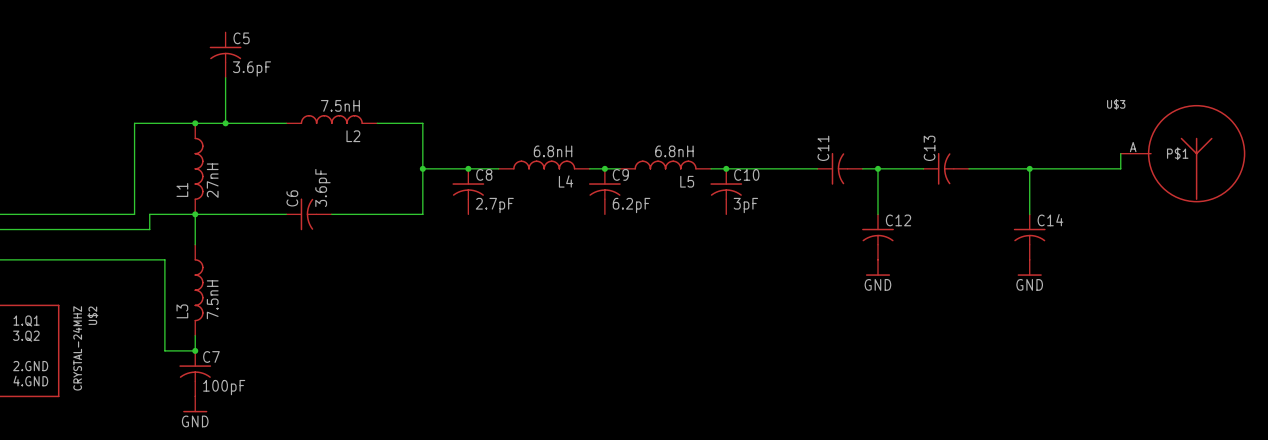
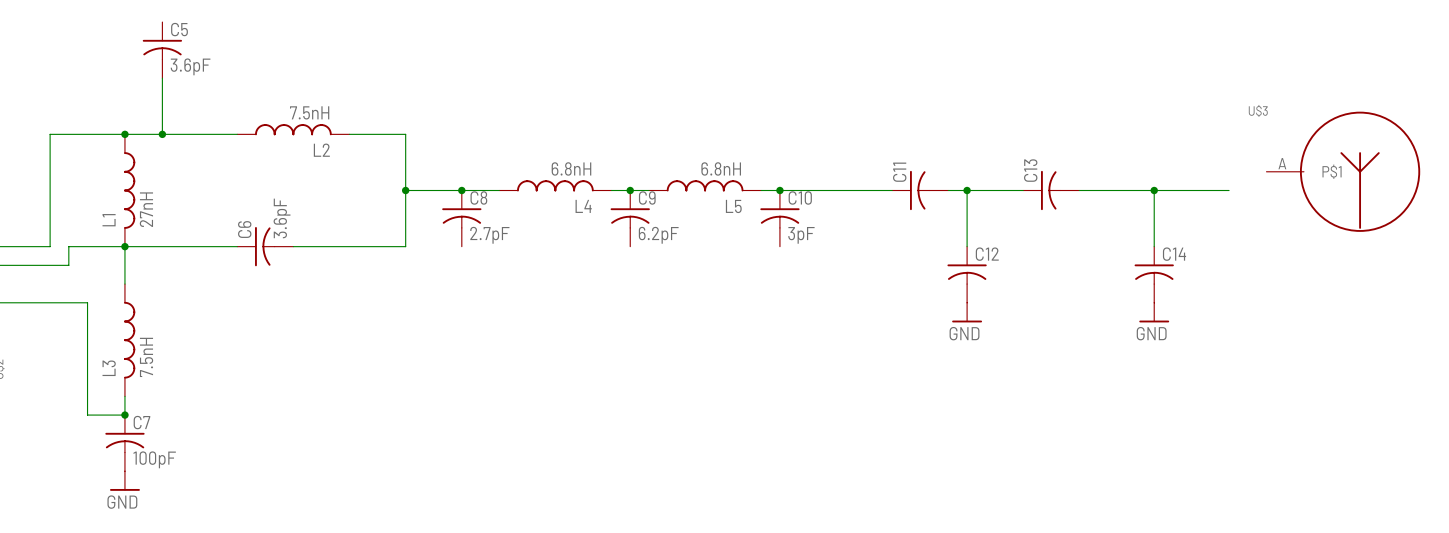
wire: (1120, 153) (1120, 168) (1090, 168) -> none

